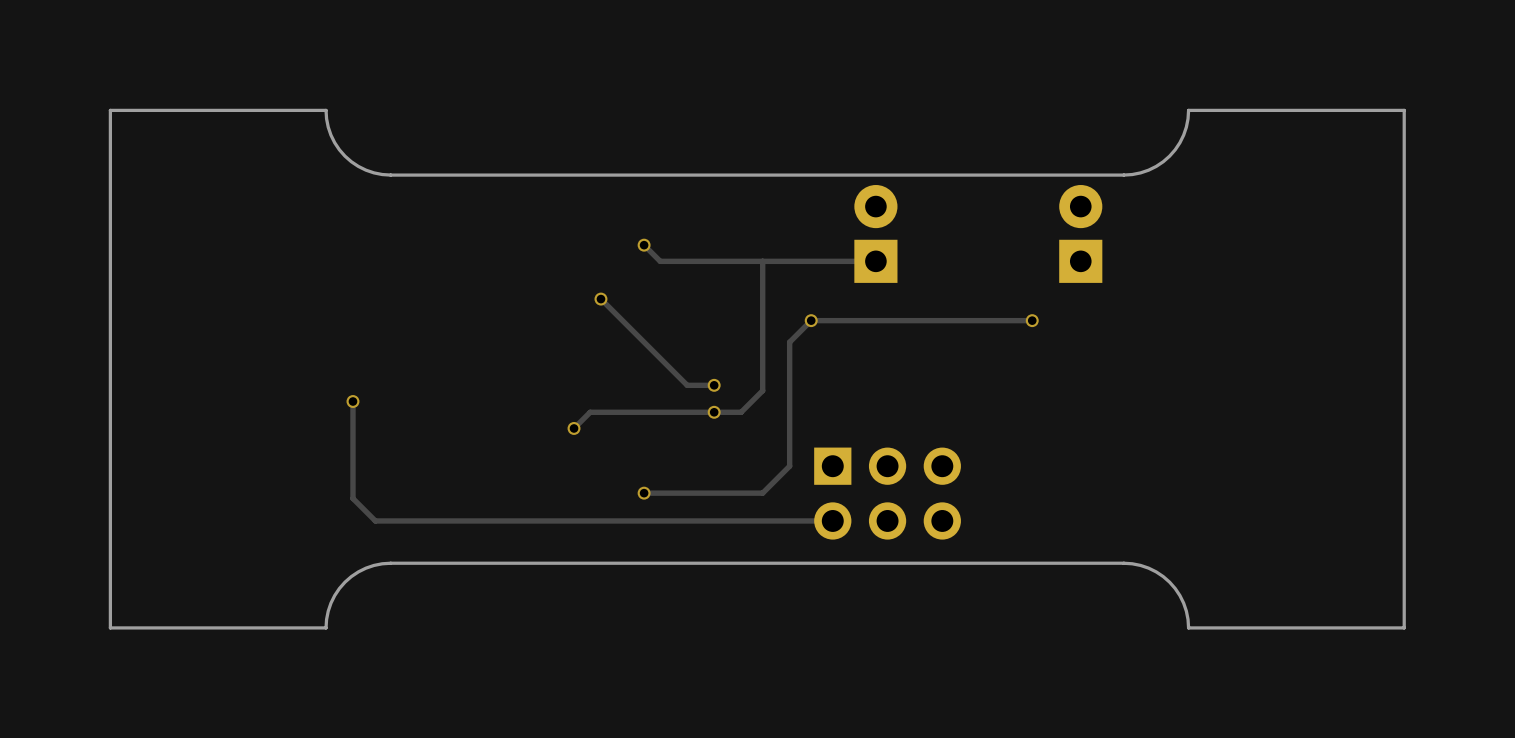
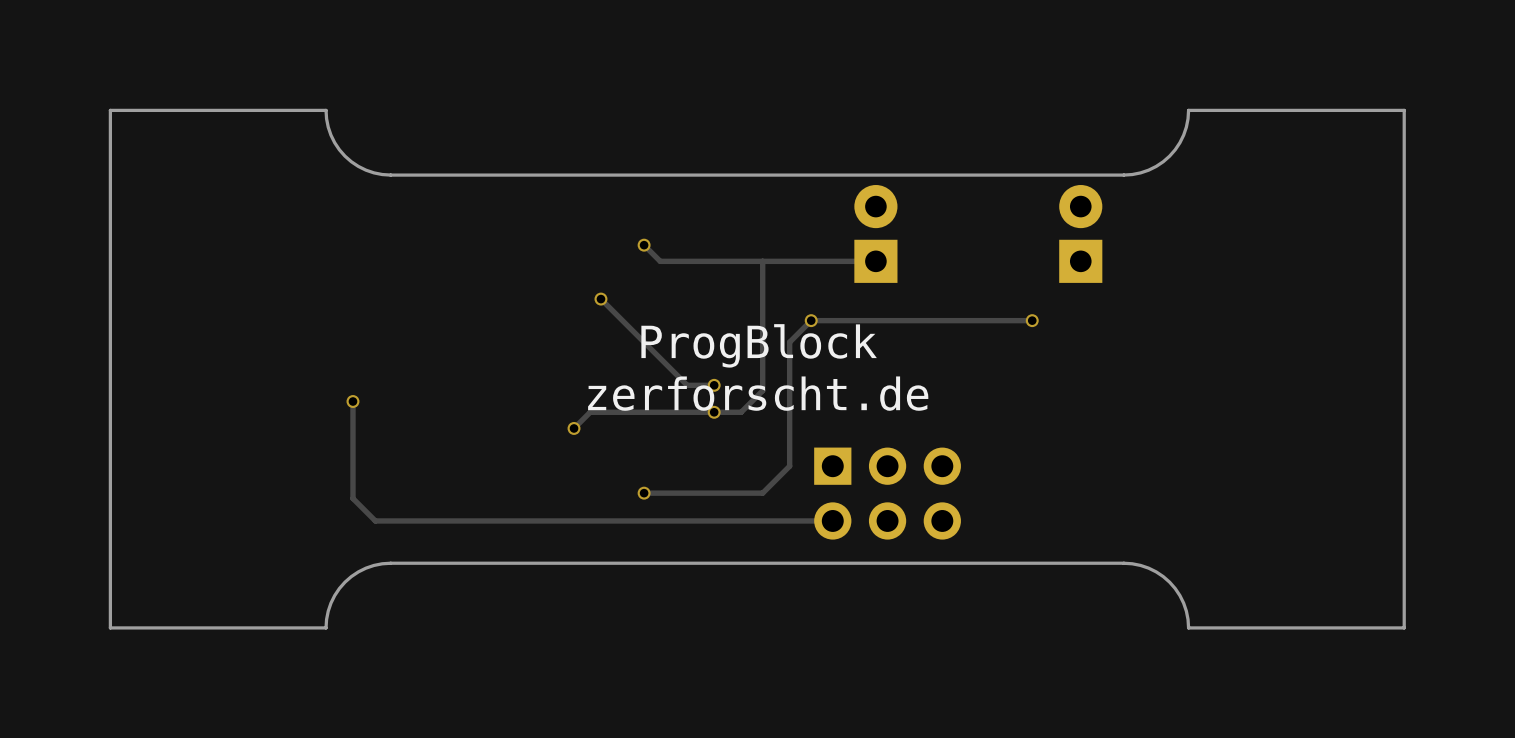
text: none -> ProgBlock (759, 345)
text: none -> zerforscht.de (758, 393)

